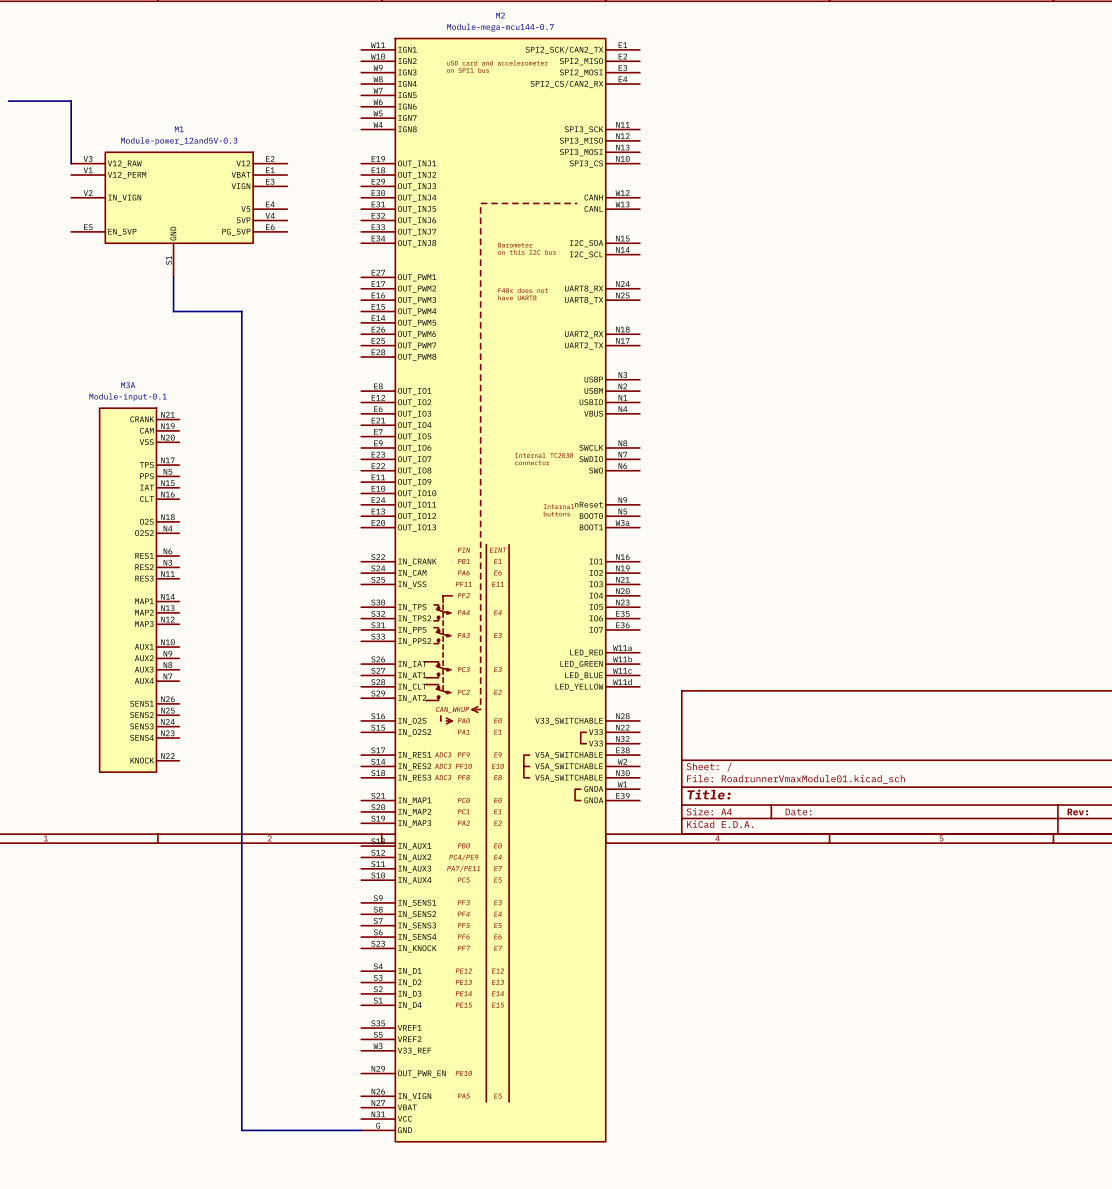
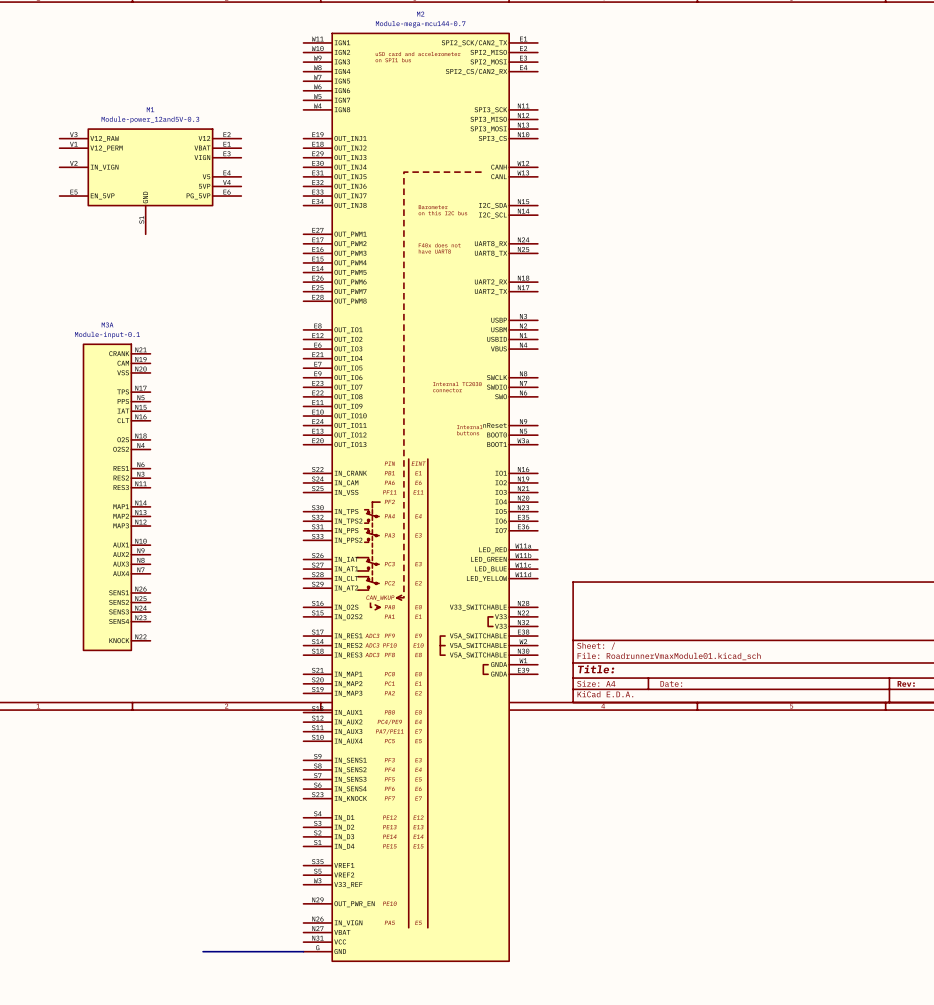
wire: (8, 101) (71, 101) (71, 163) -> none
wire: (173, 277) (173, 311) (241, 311) (241, 1130) -> none

